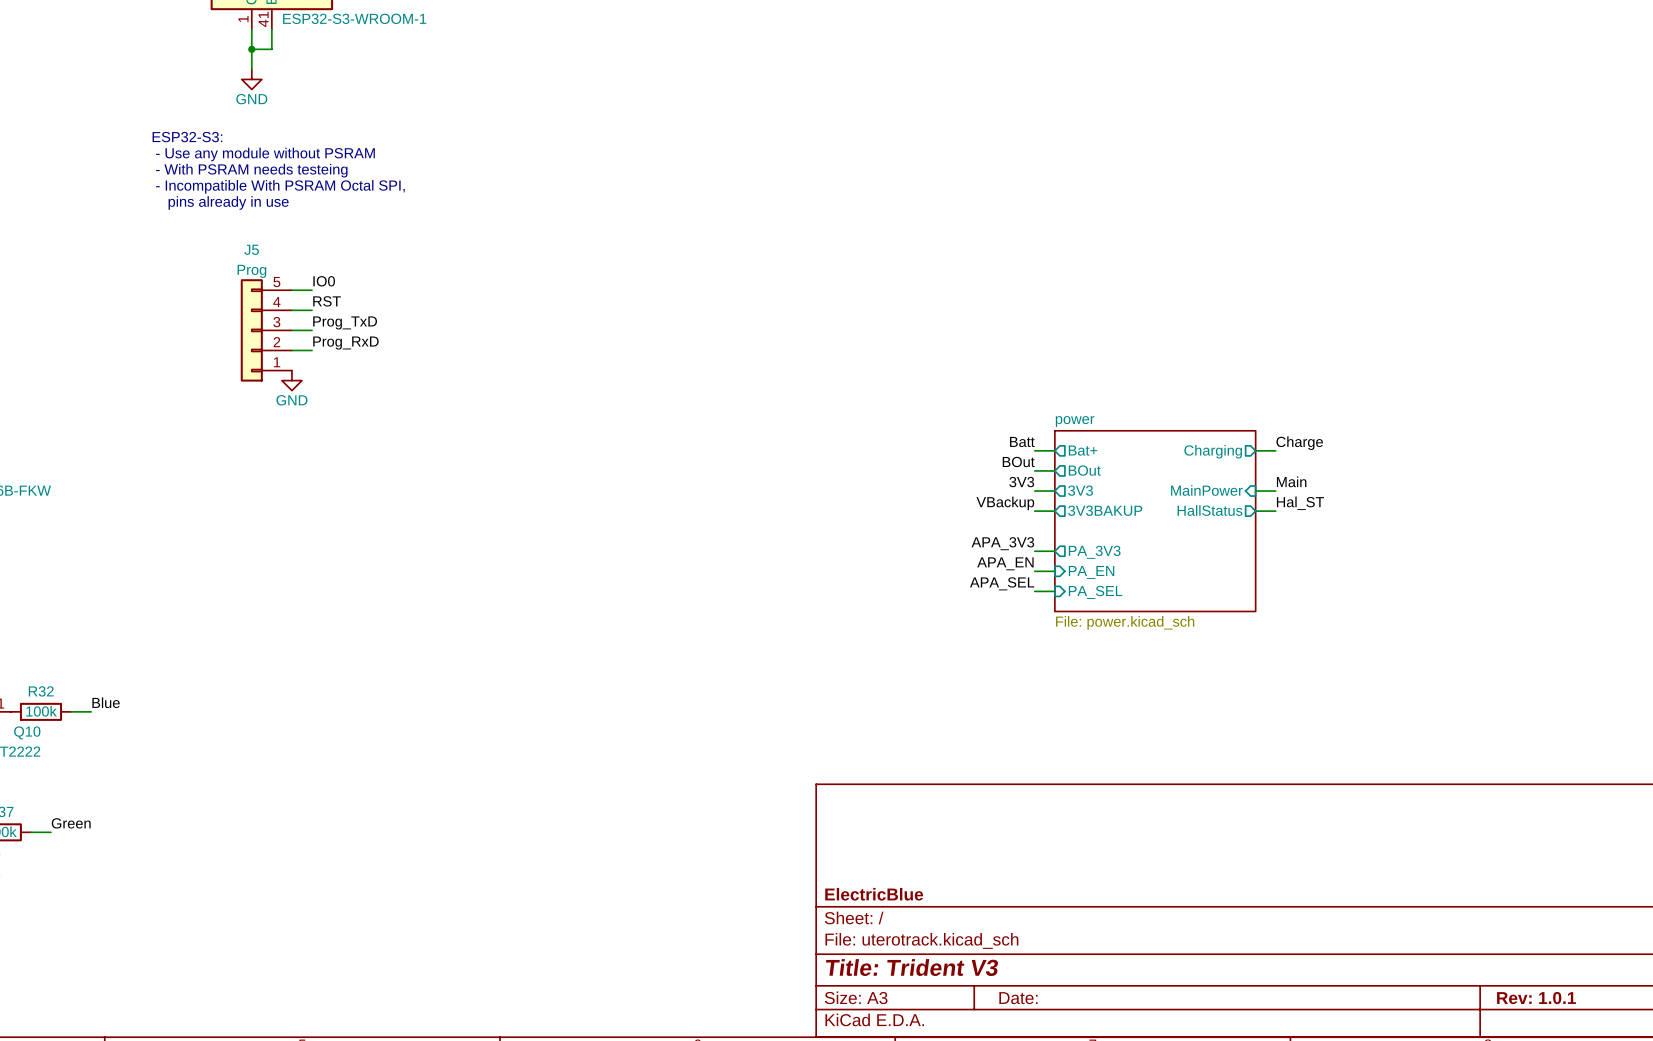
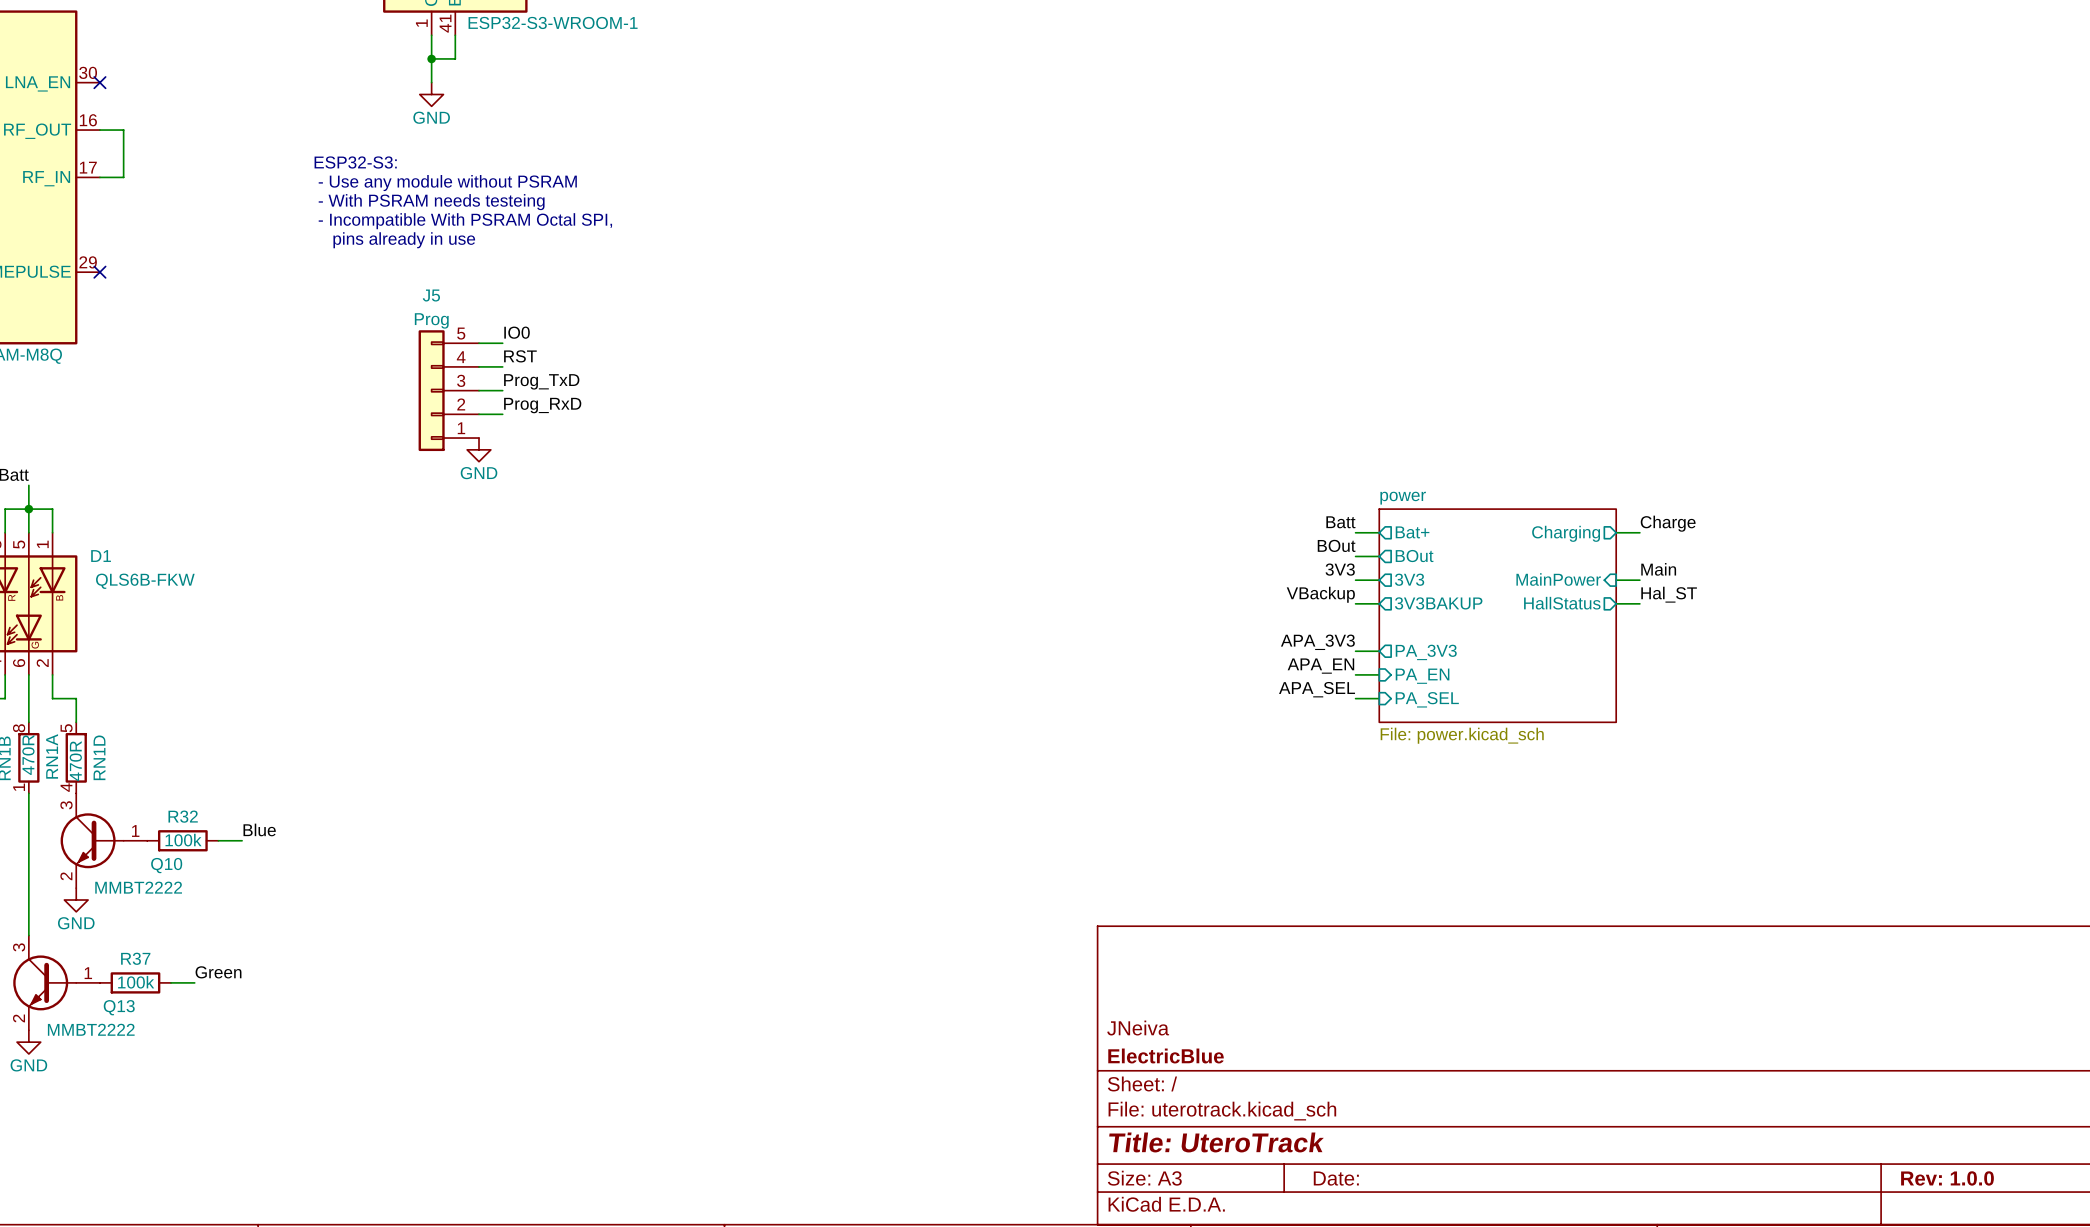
title block: none -> JNeiva (1138, 1028)
title block: Title: Trident V3 (912, 967) -> Title: UteroTrack (1216, 1142)
title block: Rev: 1.0.1 (1536, 998) -> Rev: 1.0.0 (1947, 1178)

